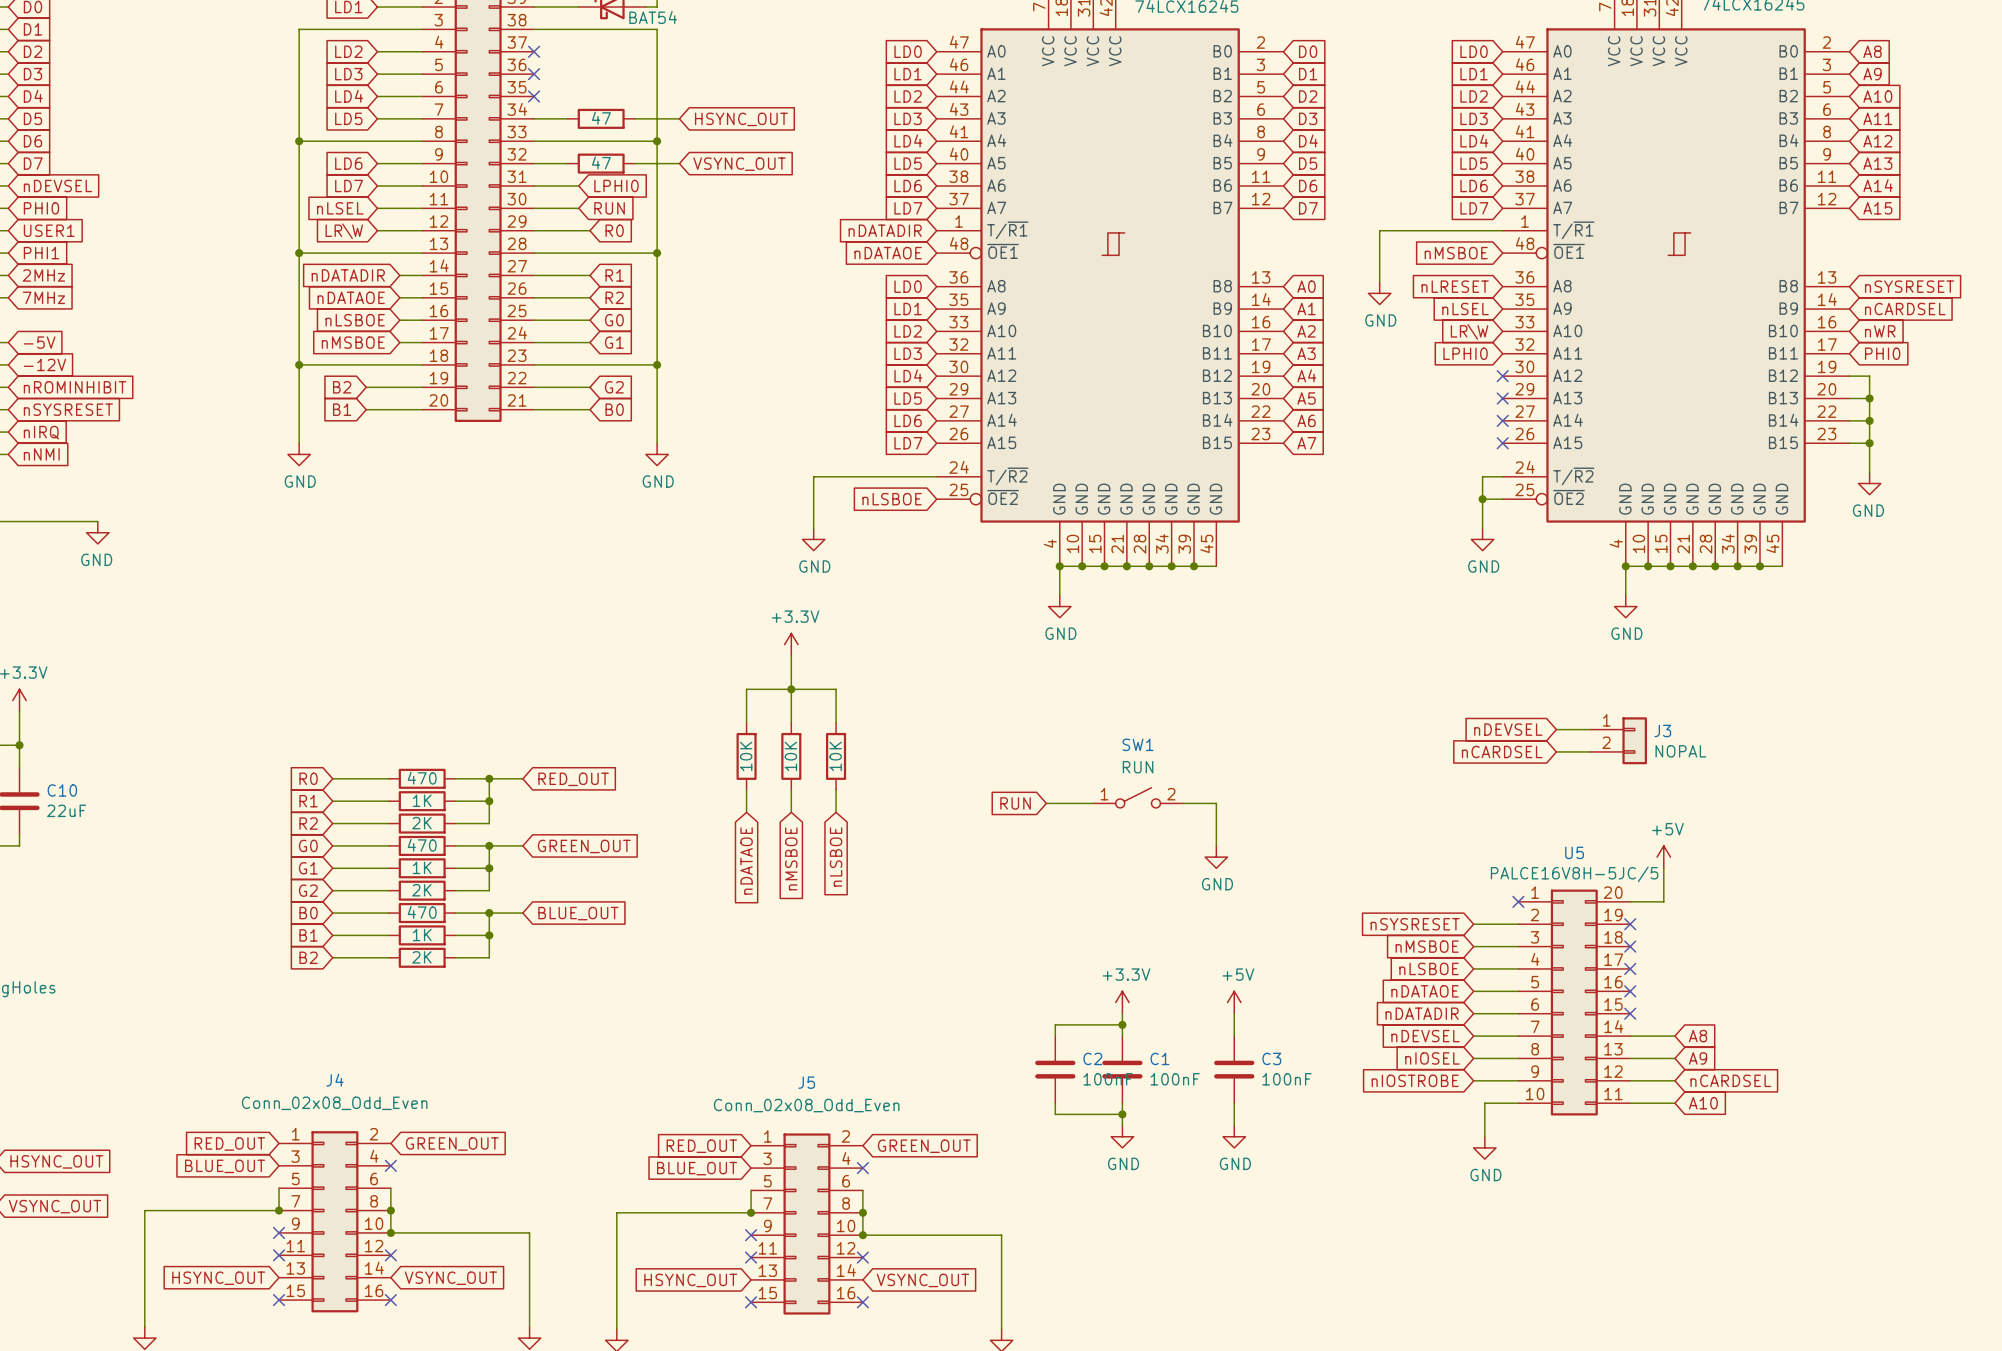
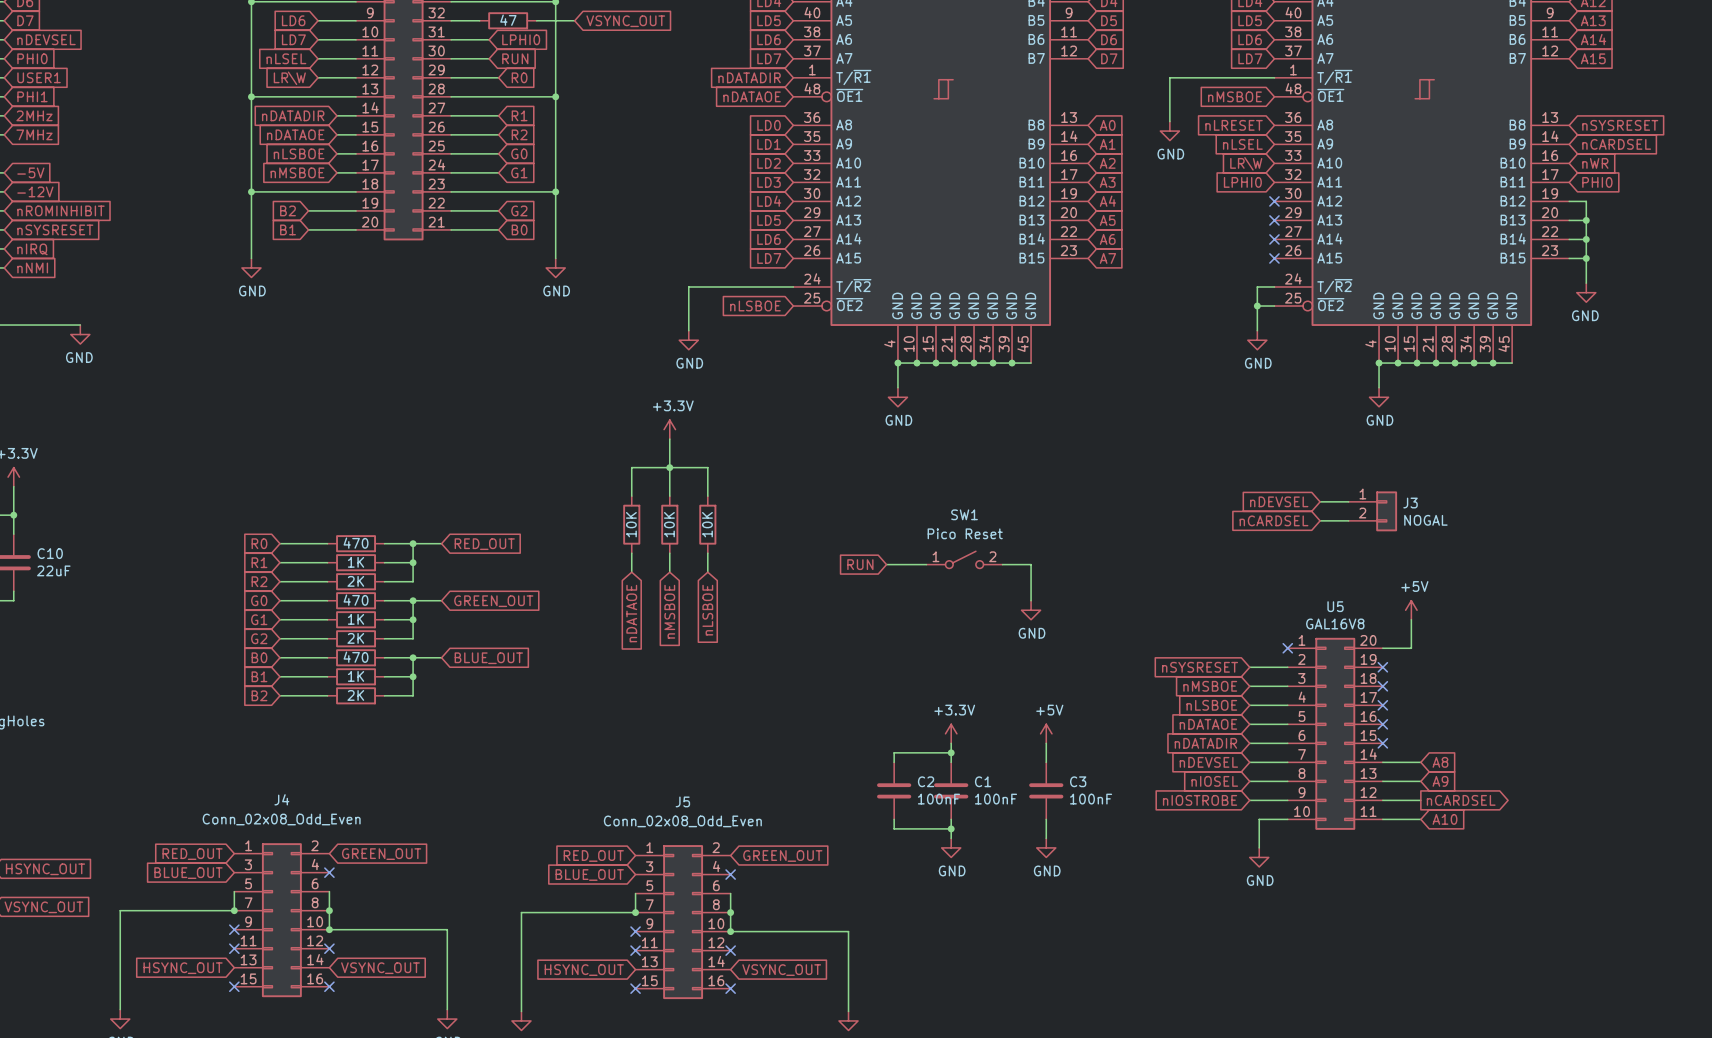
J3 value: NOPAL (1680, 751) -> NOGAL (1425, 520)
SW1 value: RUN (1138, 767) -> Pico Reset (965, 533)
U5 value: PALCE16V8H-5JC/5 (1574, 874) -> GAL16V8 (1335, 623)
global label shape: input (1730, 1080) -> output (1461, 800)

